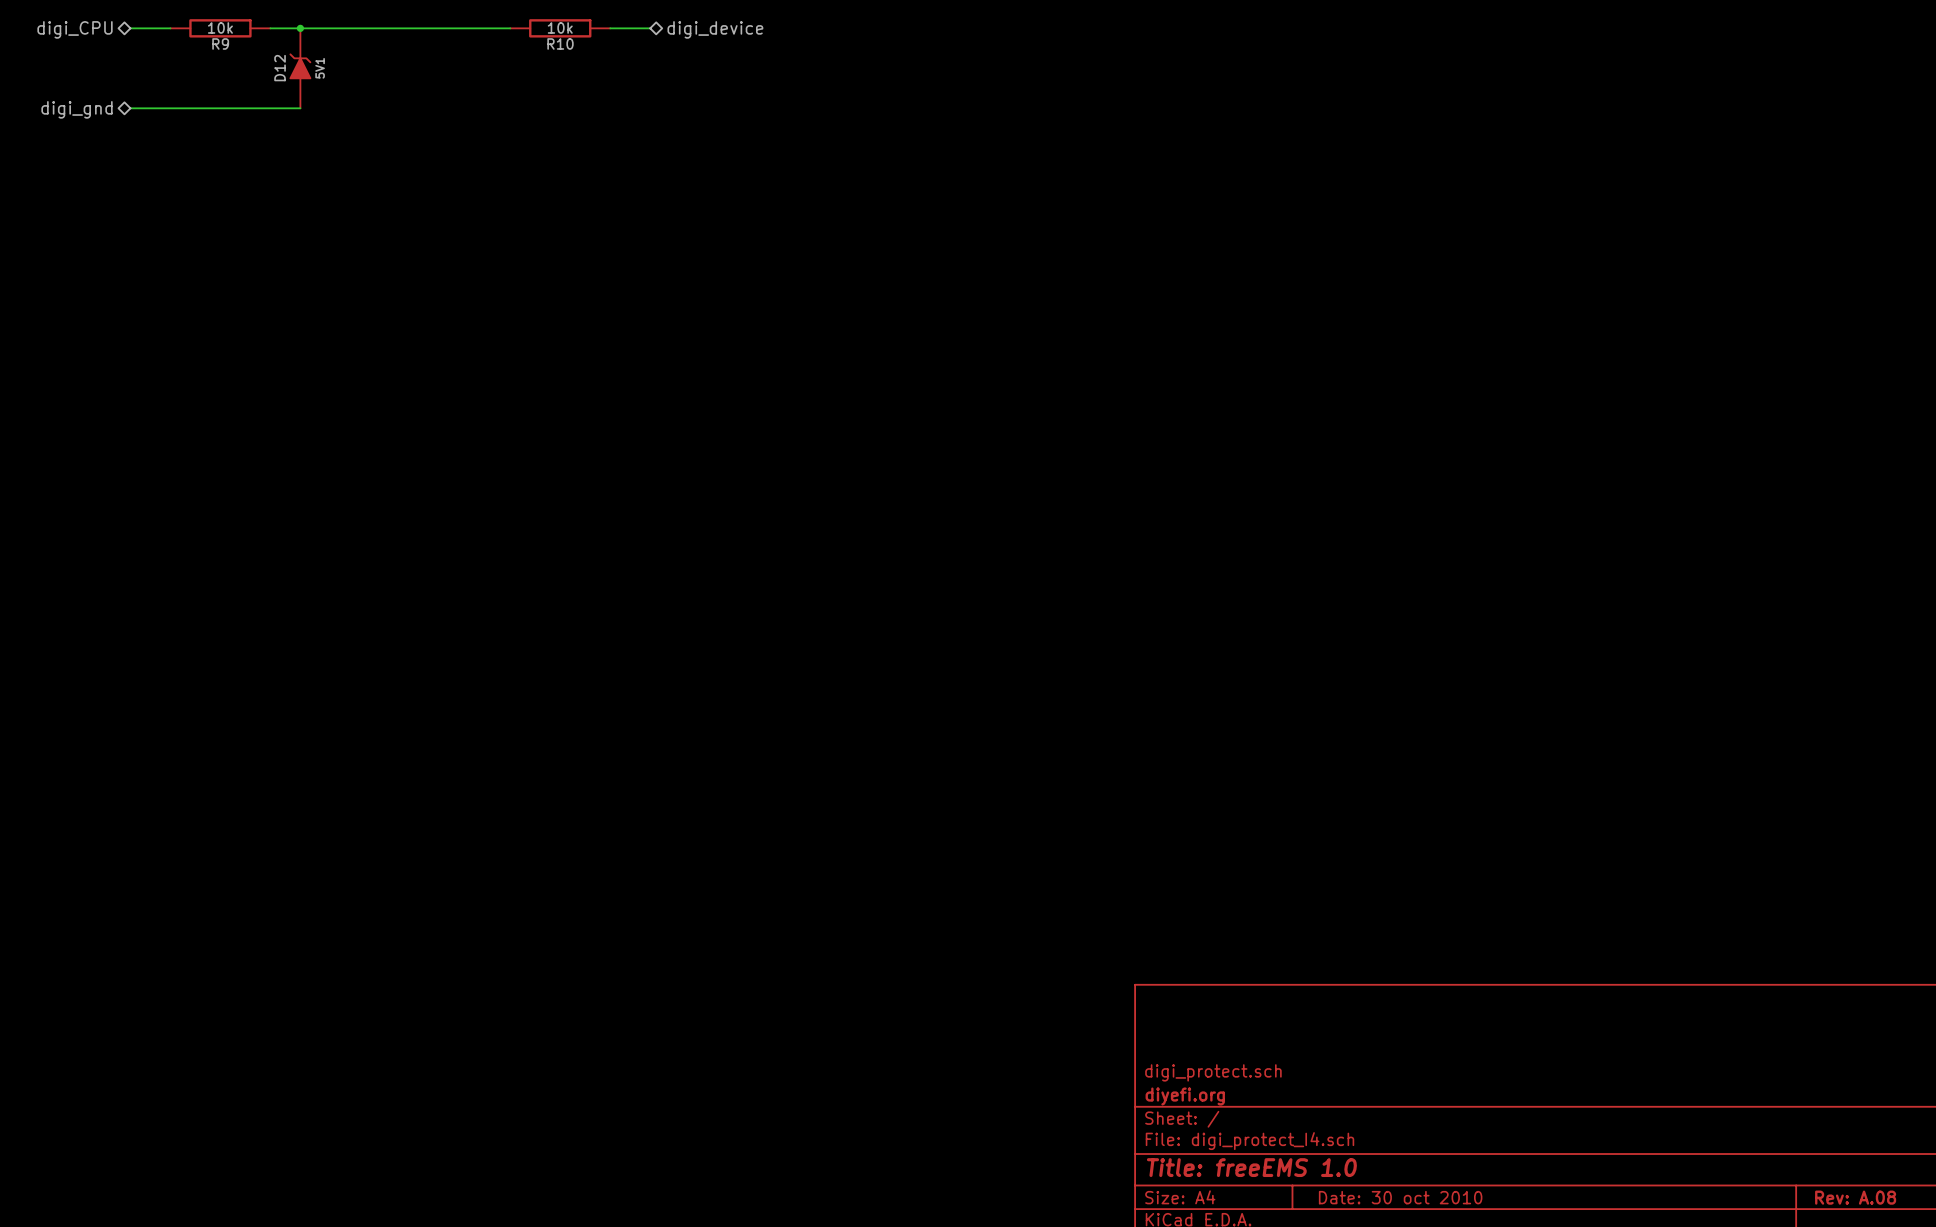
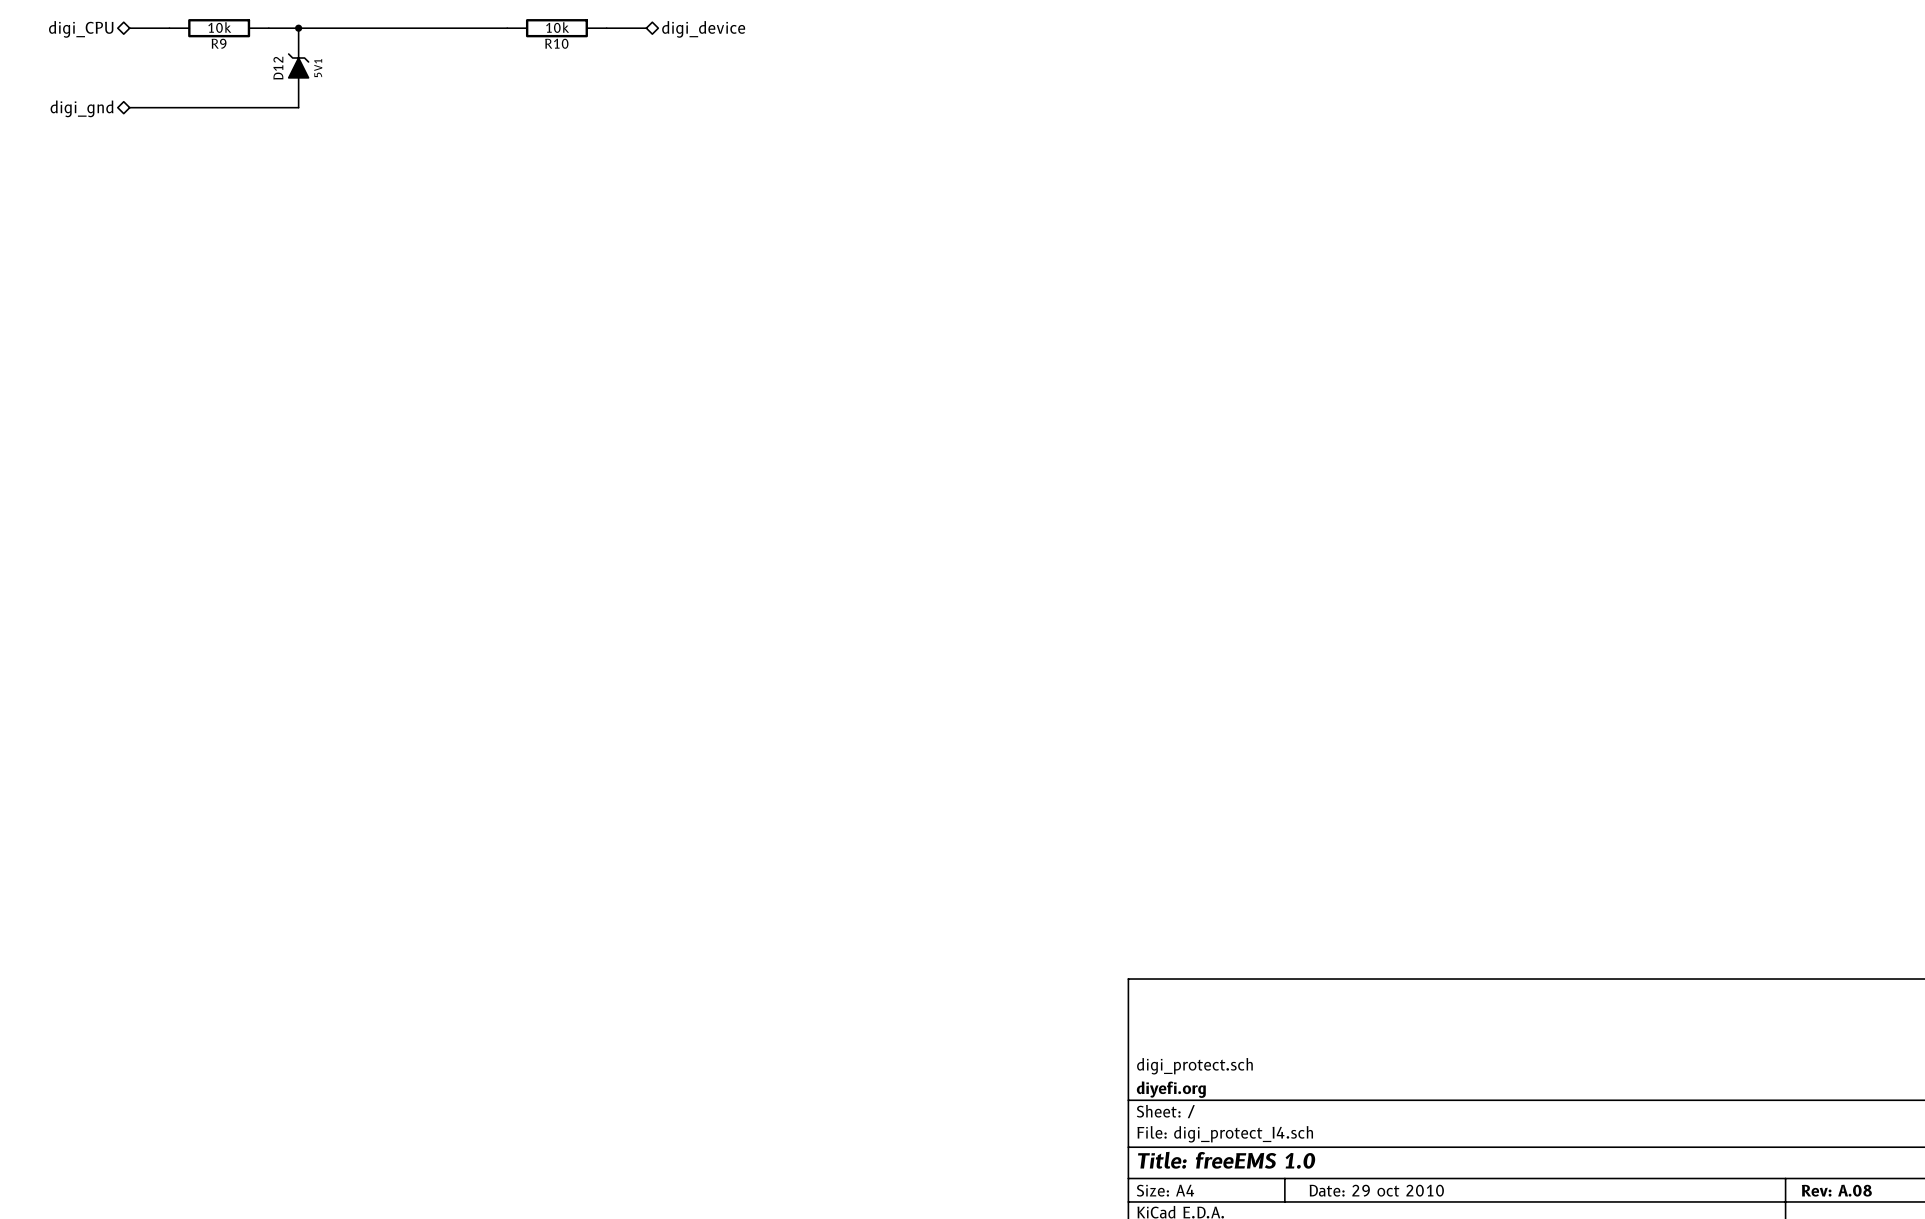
title block: Date: 30 oct 2010 (1400, 1197) -> Date: 29 oct 2010 (1376, 1190)

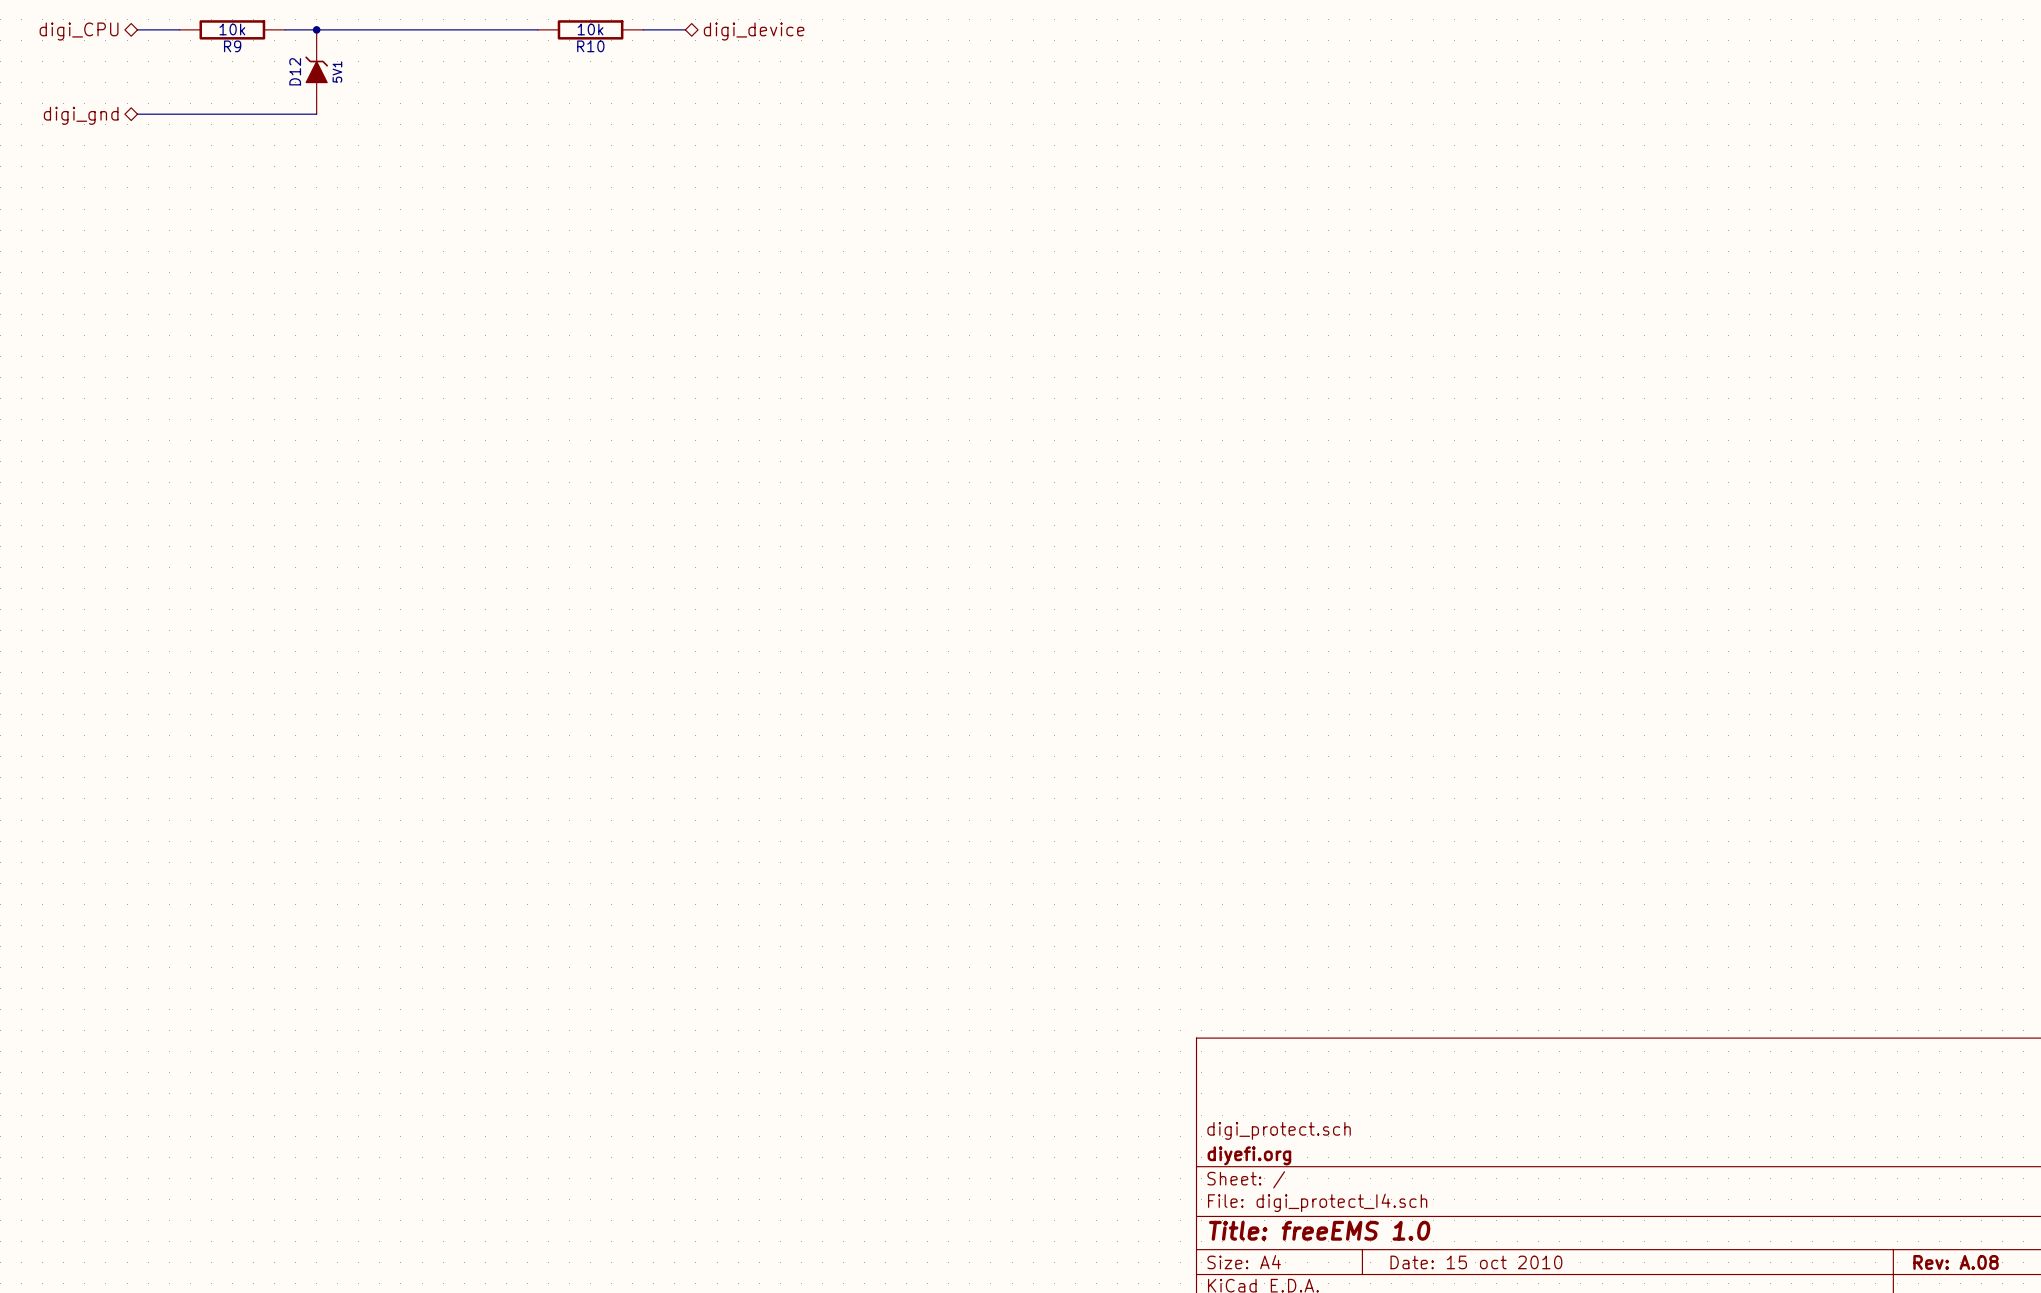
title block: Date: 29 oct 2010 (1376, 1190) -> Date: 15 oct 2010 (1476, 1262)

